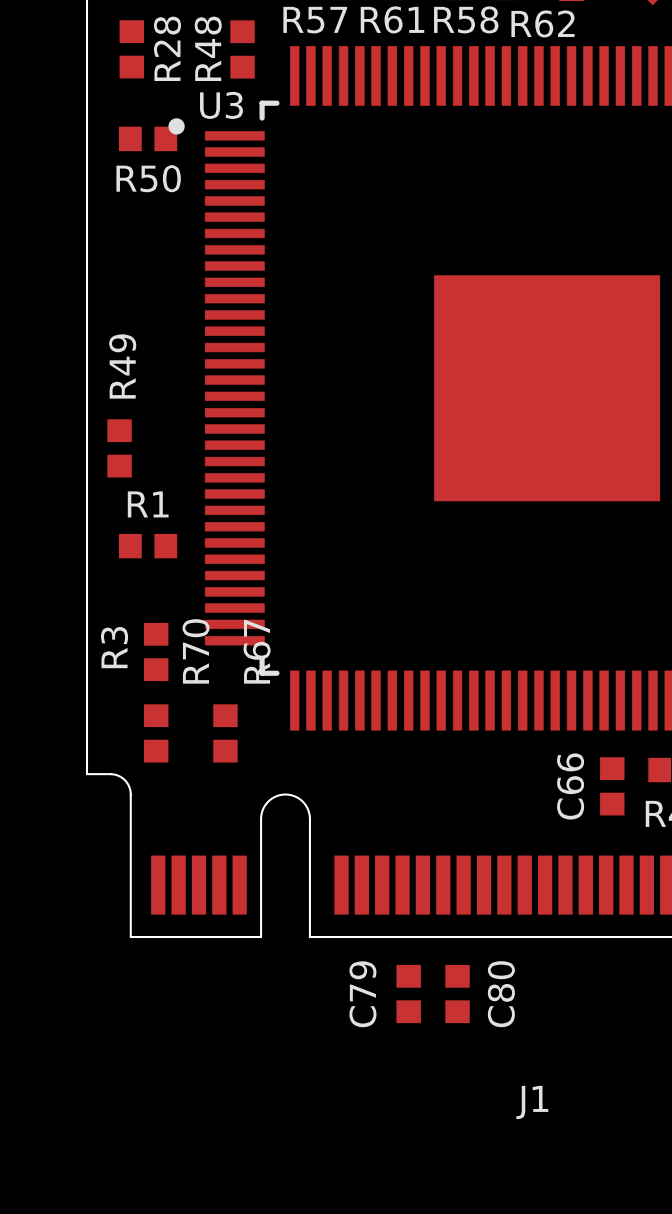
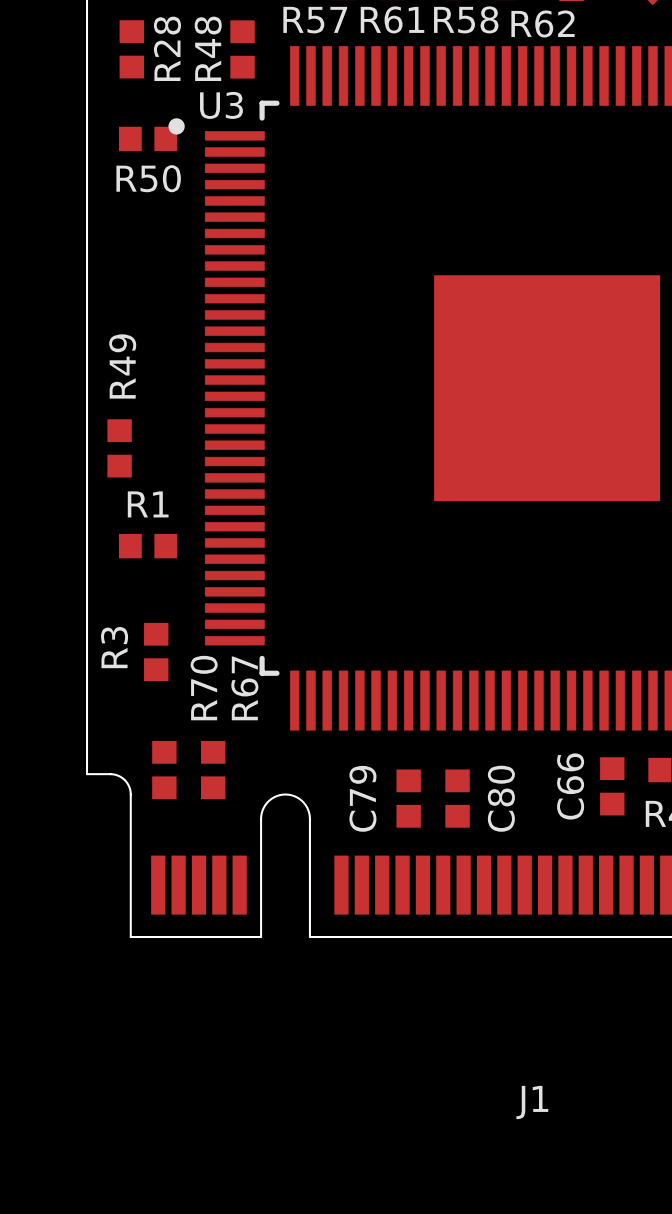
R70 position: (156, 733) -> (164, 770)
R67 position: (225, 733) -> (213, 770)
C79 position: (408, 994) -> (408, 798)
C80 position: (457, 994) -> (457, 798)

